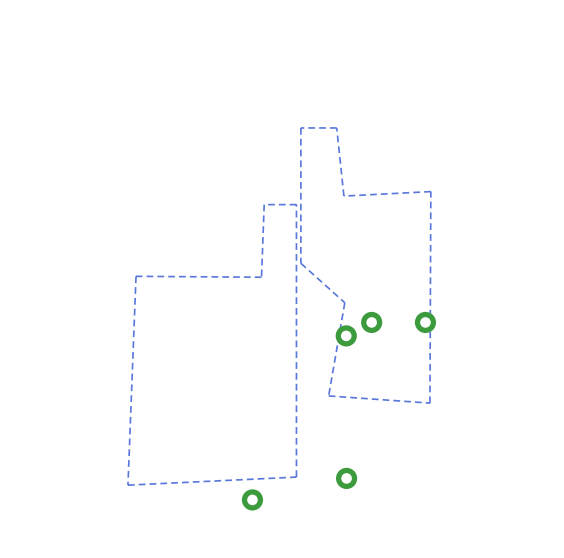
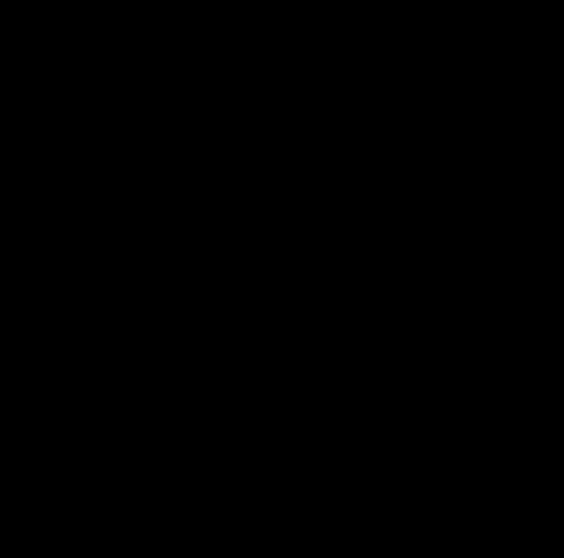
zone outline: (336, 127) (343, 196) (430, 191) (429, 403) (328, 395) (344, 302) (300, 263) (300, 127) (336, 127) -> none
zone outline: (296, 204) (296, 477) (127, 485) (136, 276) (261, 277) (264, 204) (296, 204) -> none
via: (371, 322) -> none
via: (425, 322) -> none
via: (346, 335) -> none
via: (346, 478) -> none
via: (252, 499) -> none

